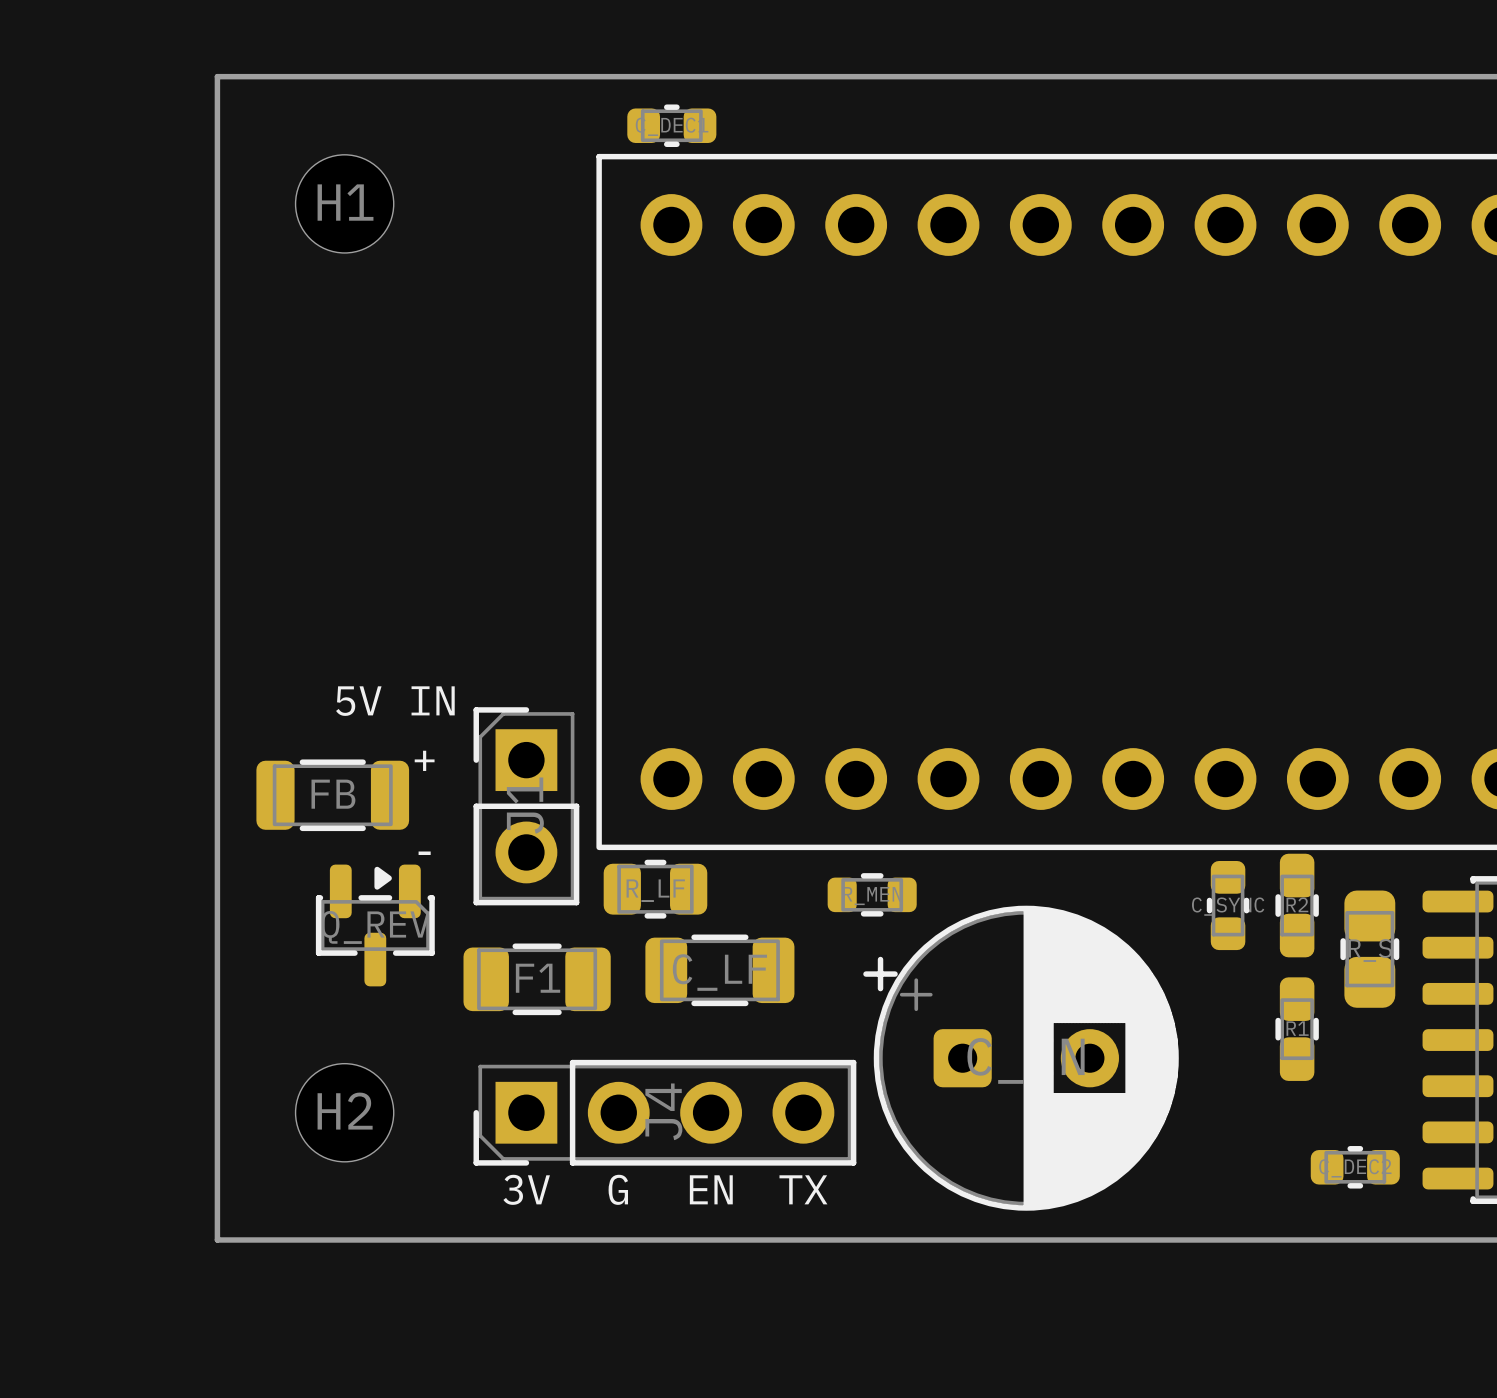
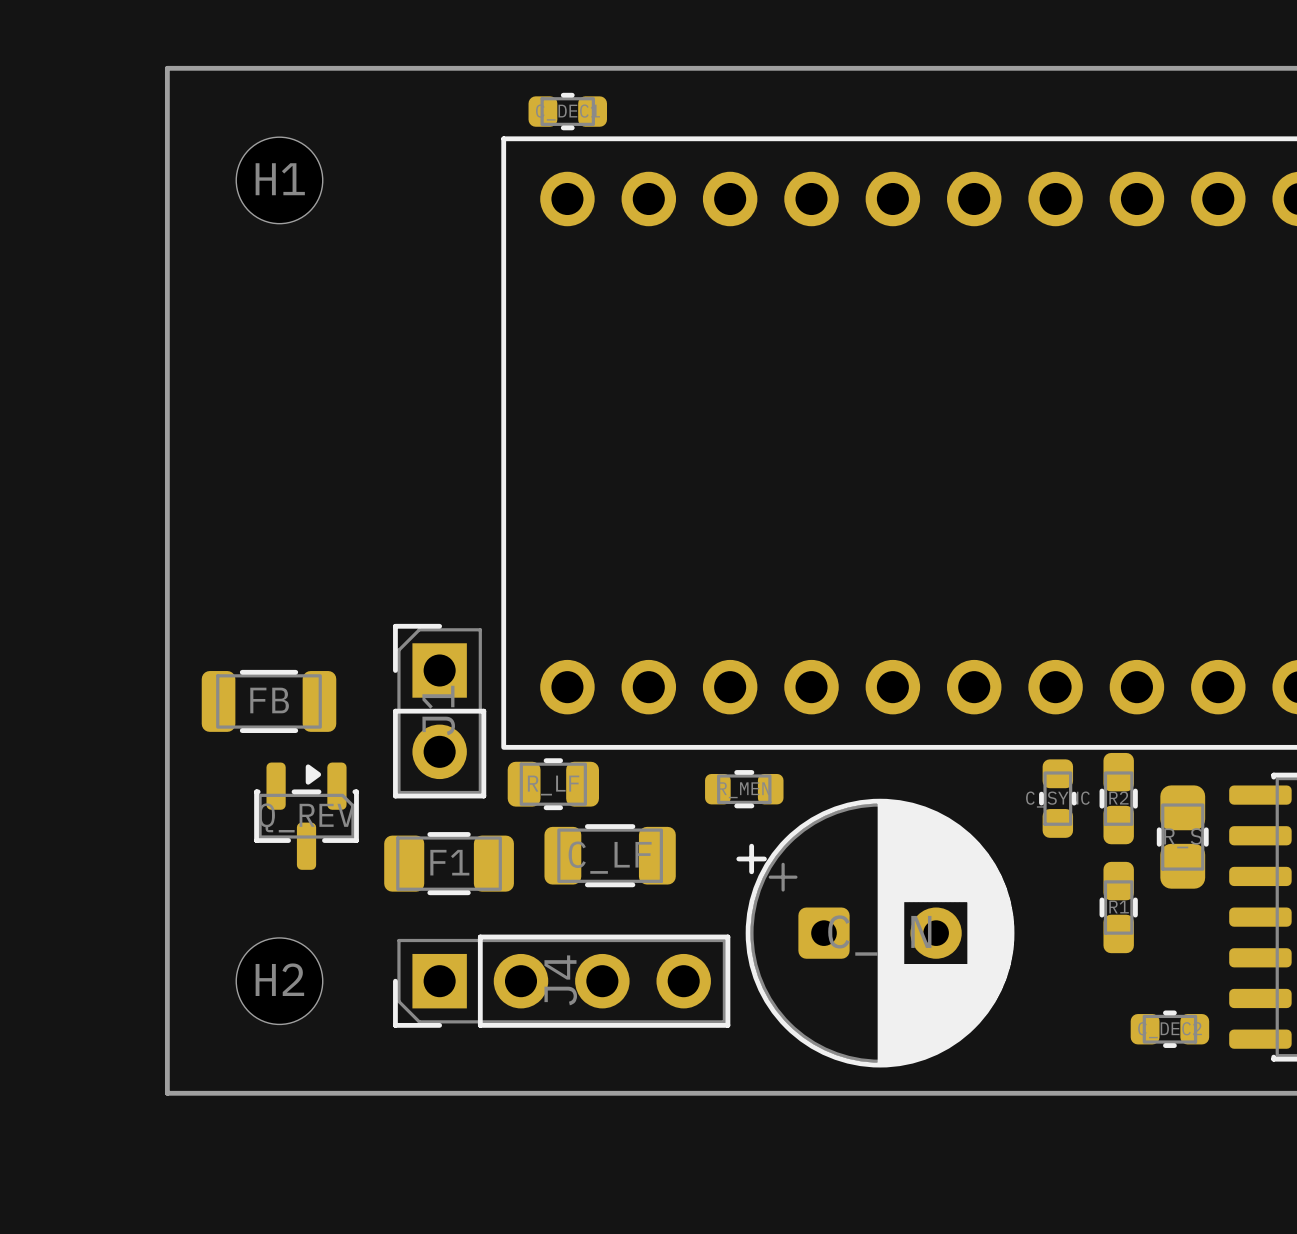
text: 5V IN (395, 701) -> none
text: + (424, 760) -> none
text: - (424, 853) -> none
text: 3V (526, 1189) -> none
text: G (618, 1189) -> none
text: EN (711, 1189) -> none
text: TX (803, 1189) -> none

